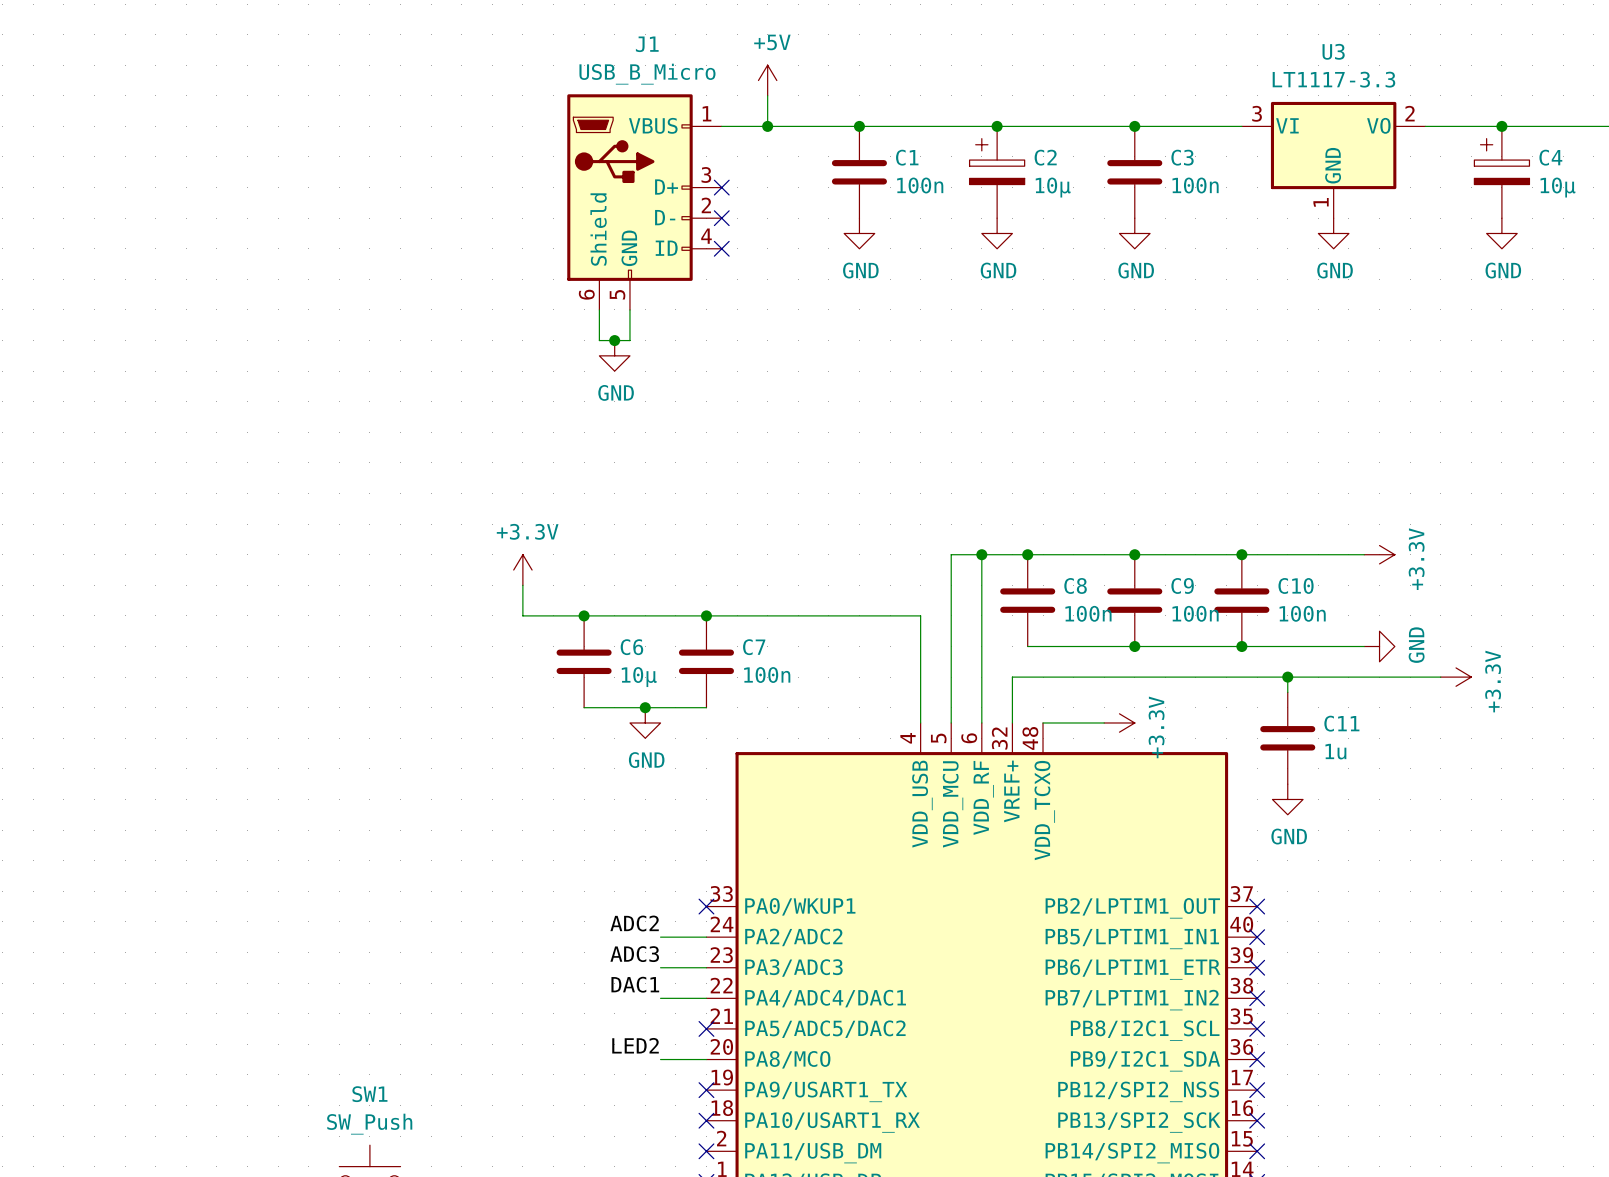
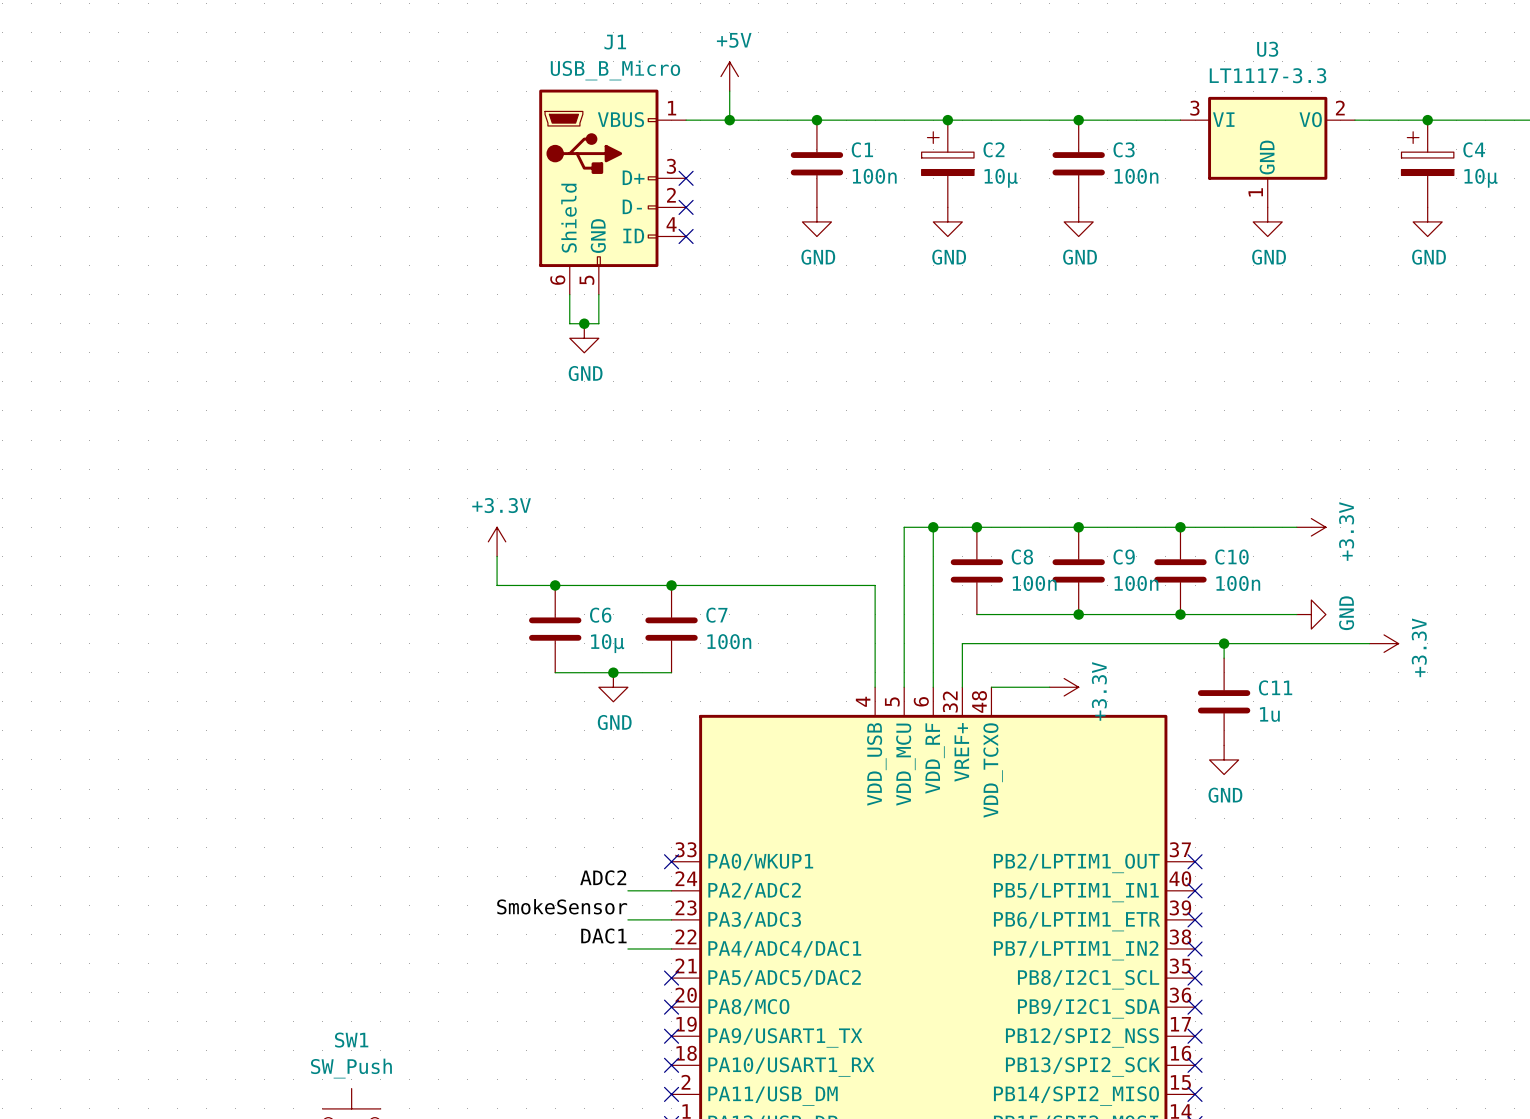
label: ADC3 (634, 954) -> SmokeSensor (562, 906)
label: LED2 (635, 1045) -> none
wire: (660, 1059) (706, 1059) -> none
no-connect mark: none -> (671, 1007)

